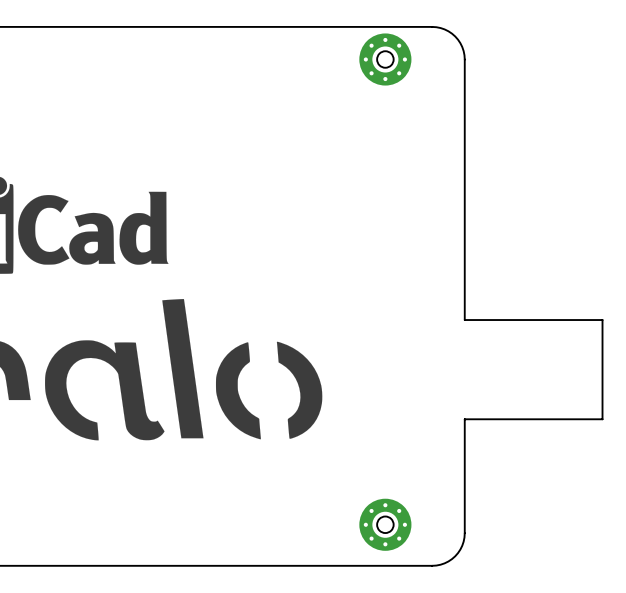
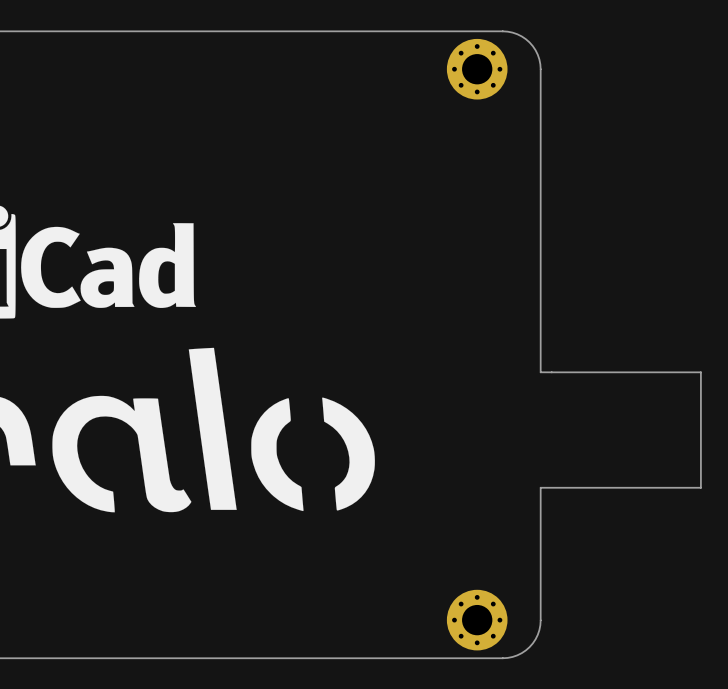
round board edge: [376, 51, 394, 68] -> none
part position: (385, 59) -> (477, 69)
round board edge: [376, 516, 394, 534] -> none
part position: (385, 524) -> (477, 620)

